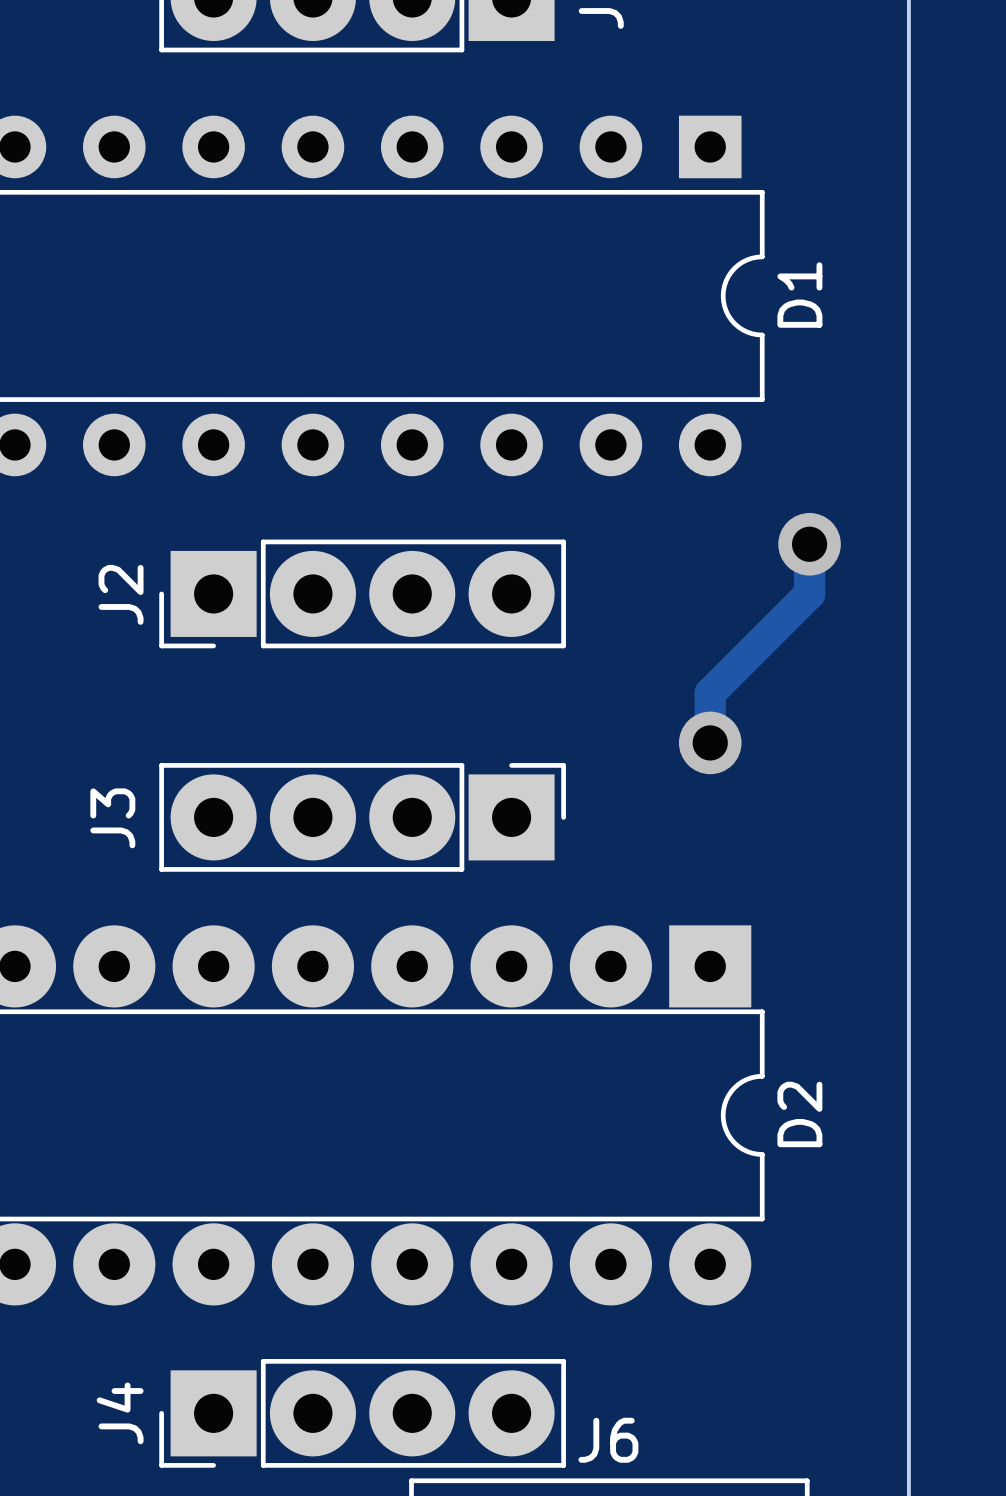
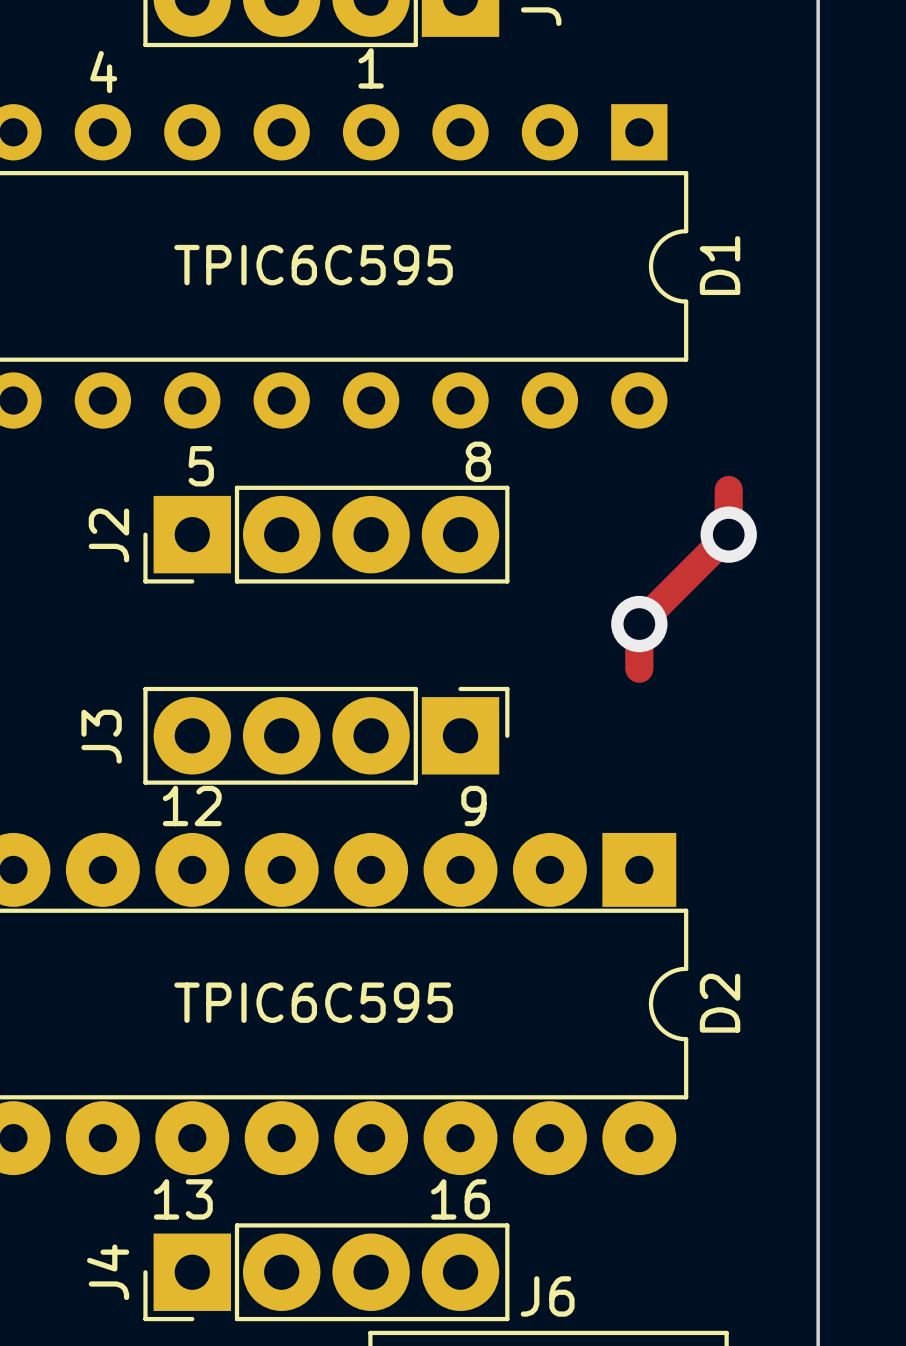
text: none -> 1 (371, 68)
text: none -> 4 (103, 72)
text: none -> TPIC6C595 (313, 265)
text: none -> 8 (478, 461)
text: none -> 5 (201, 466)
via position: (809, 544) -> (728, 534)
via position: (710, 742) -> (639, 624)
text: none -> 12 (192, 806)
text: none -> 9 (473, 806)
text: none -> TPIC6C595 (313, 1002)
text: none -> 13 (183, 1199)
text: none -> 16 (460, 1199)

